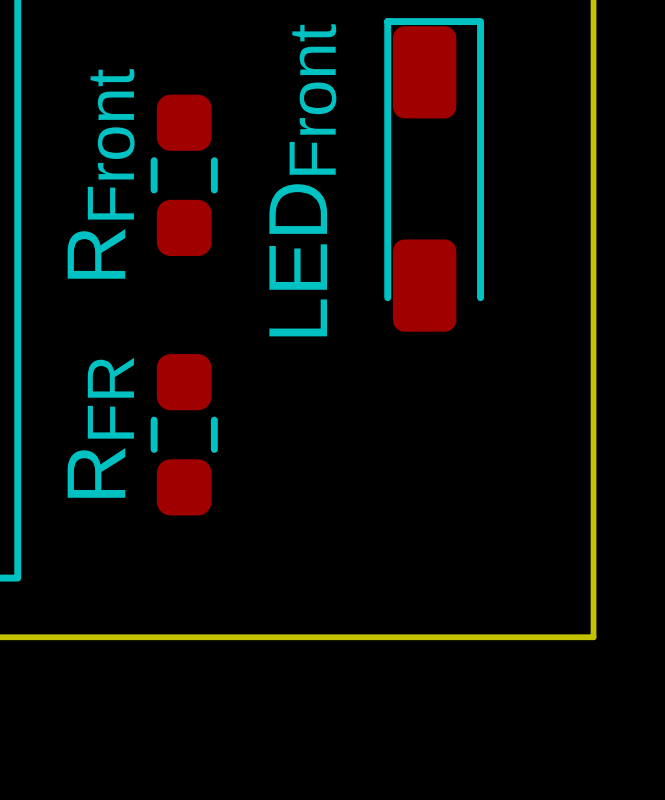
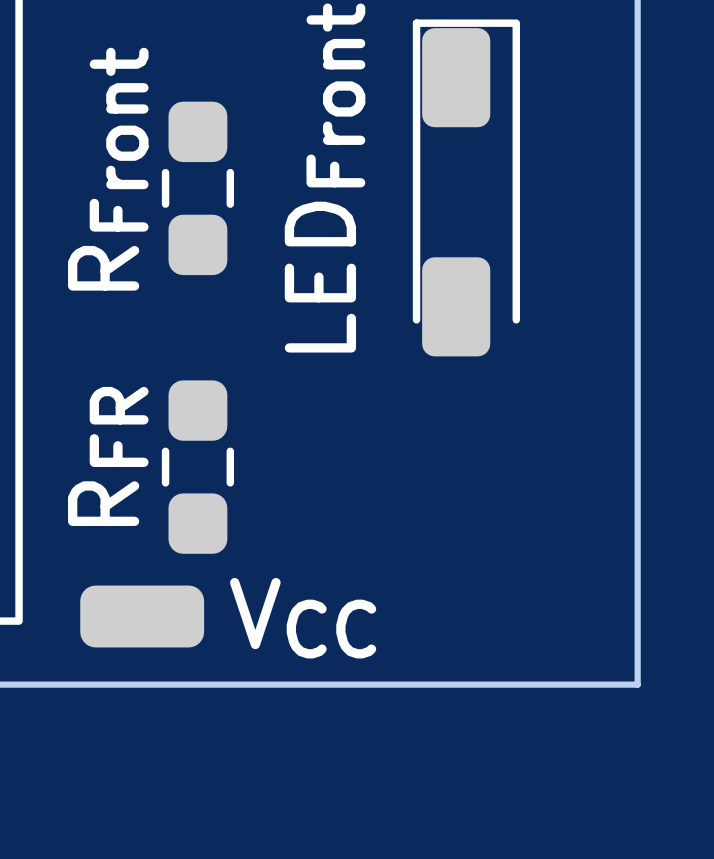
part: none -> (142, 616)
text: none -> VCC (303, 618)

